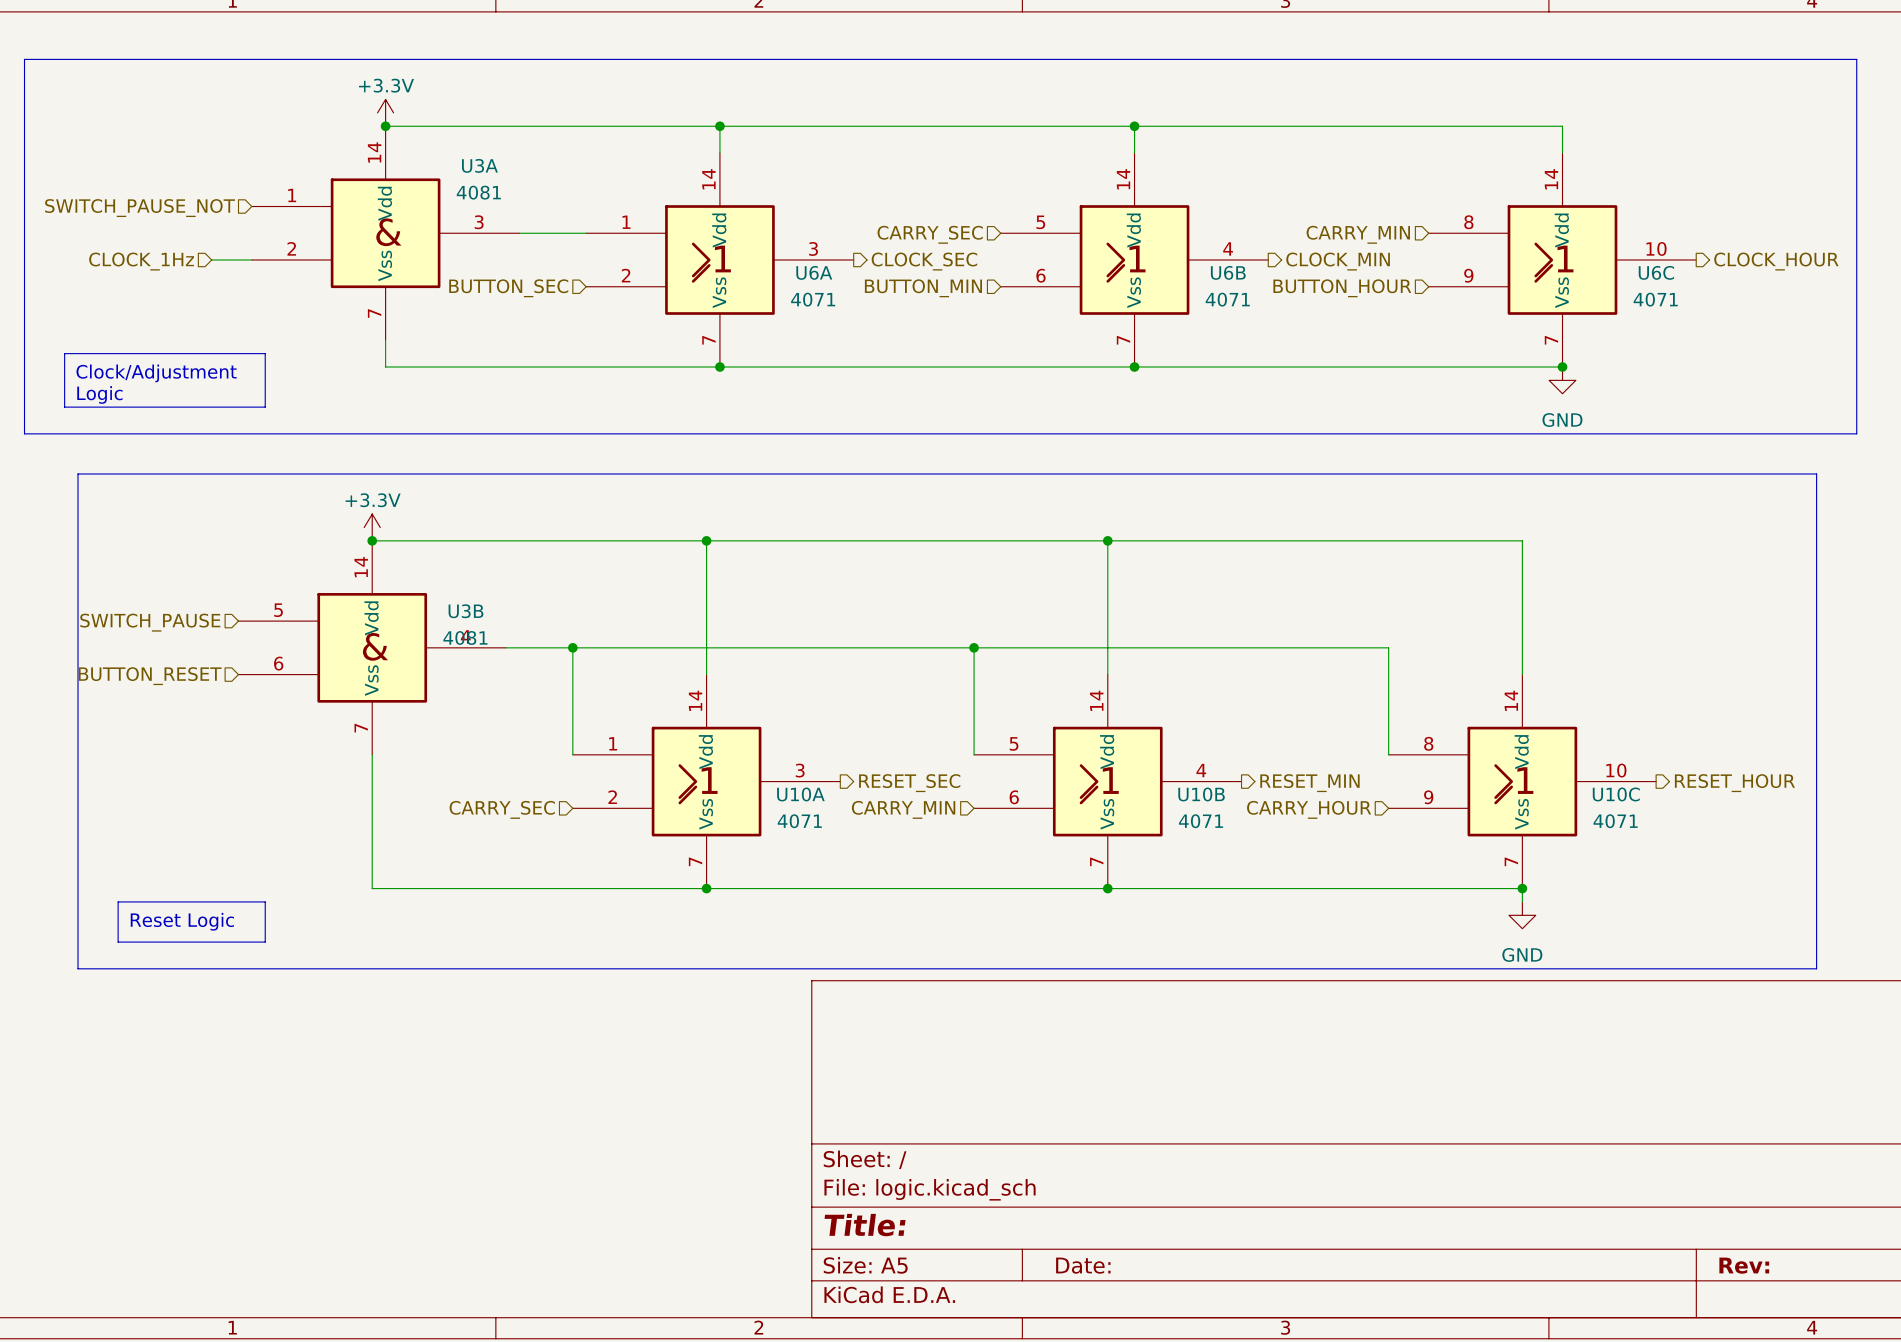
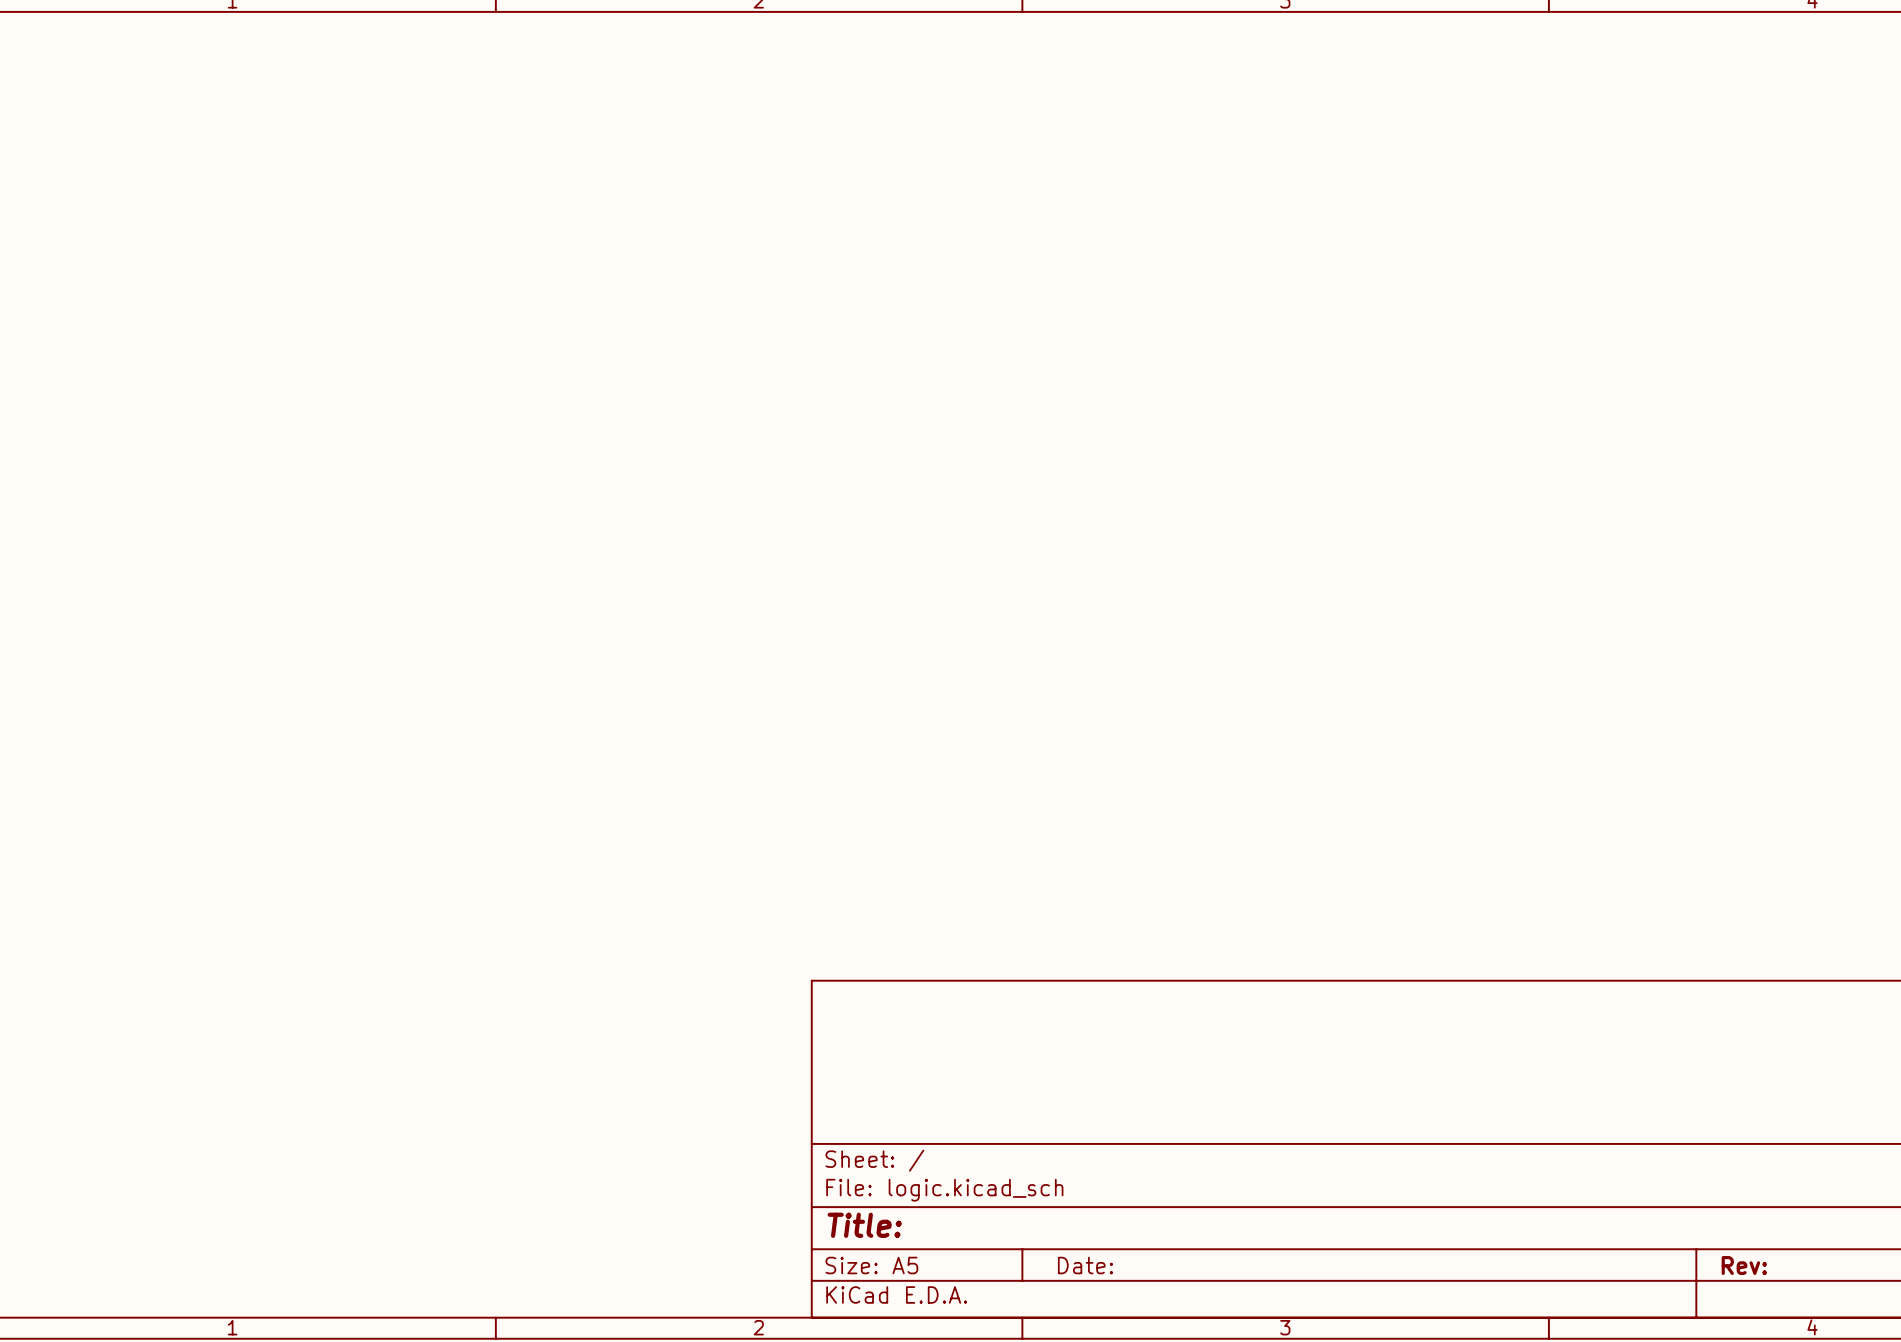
line: (24, 59) (1856, 59) (1856, 433) (24, 433) (24, 59) -> none
power symbol: +3.3V (385, 112) -> none
wire: (385, 126) (1562, 126) (1562, 153) -> none
junction: (385, 126) -> none
wire: (719, 126) (719, 153) -> none
junction: (719, 126) -> none
wire: (1134, 126) (1134, 153) -> none
junction: (1134, 126) -> none
hierarchical label: SWITCH_PAUSE_NOT (140, 208) -> none
U3A: 4081 (385, 233) -> none
wire: (519, 233) (586, 233) -> none
hierarchical label: CARRY_SEC (930, 234) -> none
hierarchical label: CARRY_MIN (1358, 234) -> none
wire: (211, 260) (251, 260) -> none
U6A: 4071 (719, 260) -> none
U6B: 4071 (1134, 260) -> none
U6C: 4071 (1562, 260) -> none
hierarchical label: CLOCK_1Hz (141, 261) -> none
hierarchical label: CLOCK_SEC (924, 261) -> none
hierarchical label: CLOCK_MIN (1338, 261) -> none
hierarchical label: CLOCK_HOUR (1776, 261) -> none
hierarchical label: BUTTON_SEC (508, 288) -> none
hierarchical label: BUTTON_MIN (923, 288) -> none
hierarchical label: BUTTON_HOUR (1342, 288) -> none
wire: (385, 340) (385, 366) (1562, 366) -> none
line: (64, 353) (265, 353) (265, 407) (64, 407) (64, 353) -> none
junction: (719, 366) -> none
junction: (1134, 366) -> none
junction: (1562, 366) -> none
text: Clock/Adjustment (156, 373) -> none
power symbol: GND (1562, 380) -> none
text: Logic (99, 394) -> none
line: (78, 473) (1816, 473) (1816, 968) (78, 968) (78, 473) -> none
power symbol: +3.3V (372, 527) -> none
wire: (372, 540) (1522, 540) (1522, 674) -> none
junction: (372, 540) -> none
wire: (706, 540) (706, 674) -> none
junction: (706, 540) -> none
wire: (1107, 540) (1107, 674) -> none
junction: (1107, 540) -> none
hierarchical label: SWITCH_PAUSE (150, 622) -> none
U3B: 4081 (372, 647) -> none
wire: (505, 647) (1388, 647) (1388, 754) -> none
wire: (572, 647) (572, 754) -> none
junction: (572, 647) -> none
wire: (974, 647) (974, 754) -> none
junction: (974, 647) -> none
hierarchical label: BUTTON_RESET (150, 676) -> none
wire: (372, 754) (372, 888) (1522, 888) (1522, 901) -> none
U10A: 4071 (706, 781) -> none
U10B: 4071 (1107, 781) -> none
U10C: 4071 (1522, 781) -> none
hierarchical label: RESET_SEC (909, 783) -> none
hierarchical label: RESET_MIN (1309, 783) -> none
hierarchical label: RESET_HOUR (1734, 783) -> none
hierarchical label: CARRY_SEC (502, 809) -> none
hierarchical label: CARRY_MIN (903, 809) -> none
hierarchical label: CARRY_HOUR (1309, 809) -> none
junction: (706, 888) -> none
junction: (1107, 888) -> none
junction: (1522, 888) -> none
line: (118, 901) (265, 901) (265, 942) (118, 942) (118, 901) -> none
power symbol: GND (1522, 915) -> none
text: Reset Logic (182, 921) -> none

